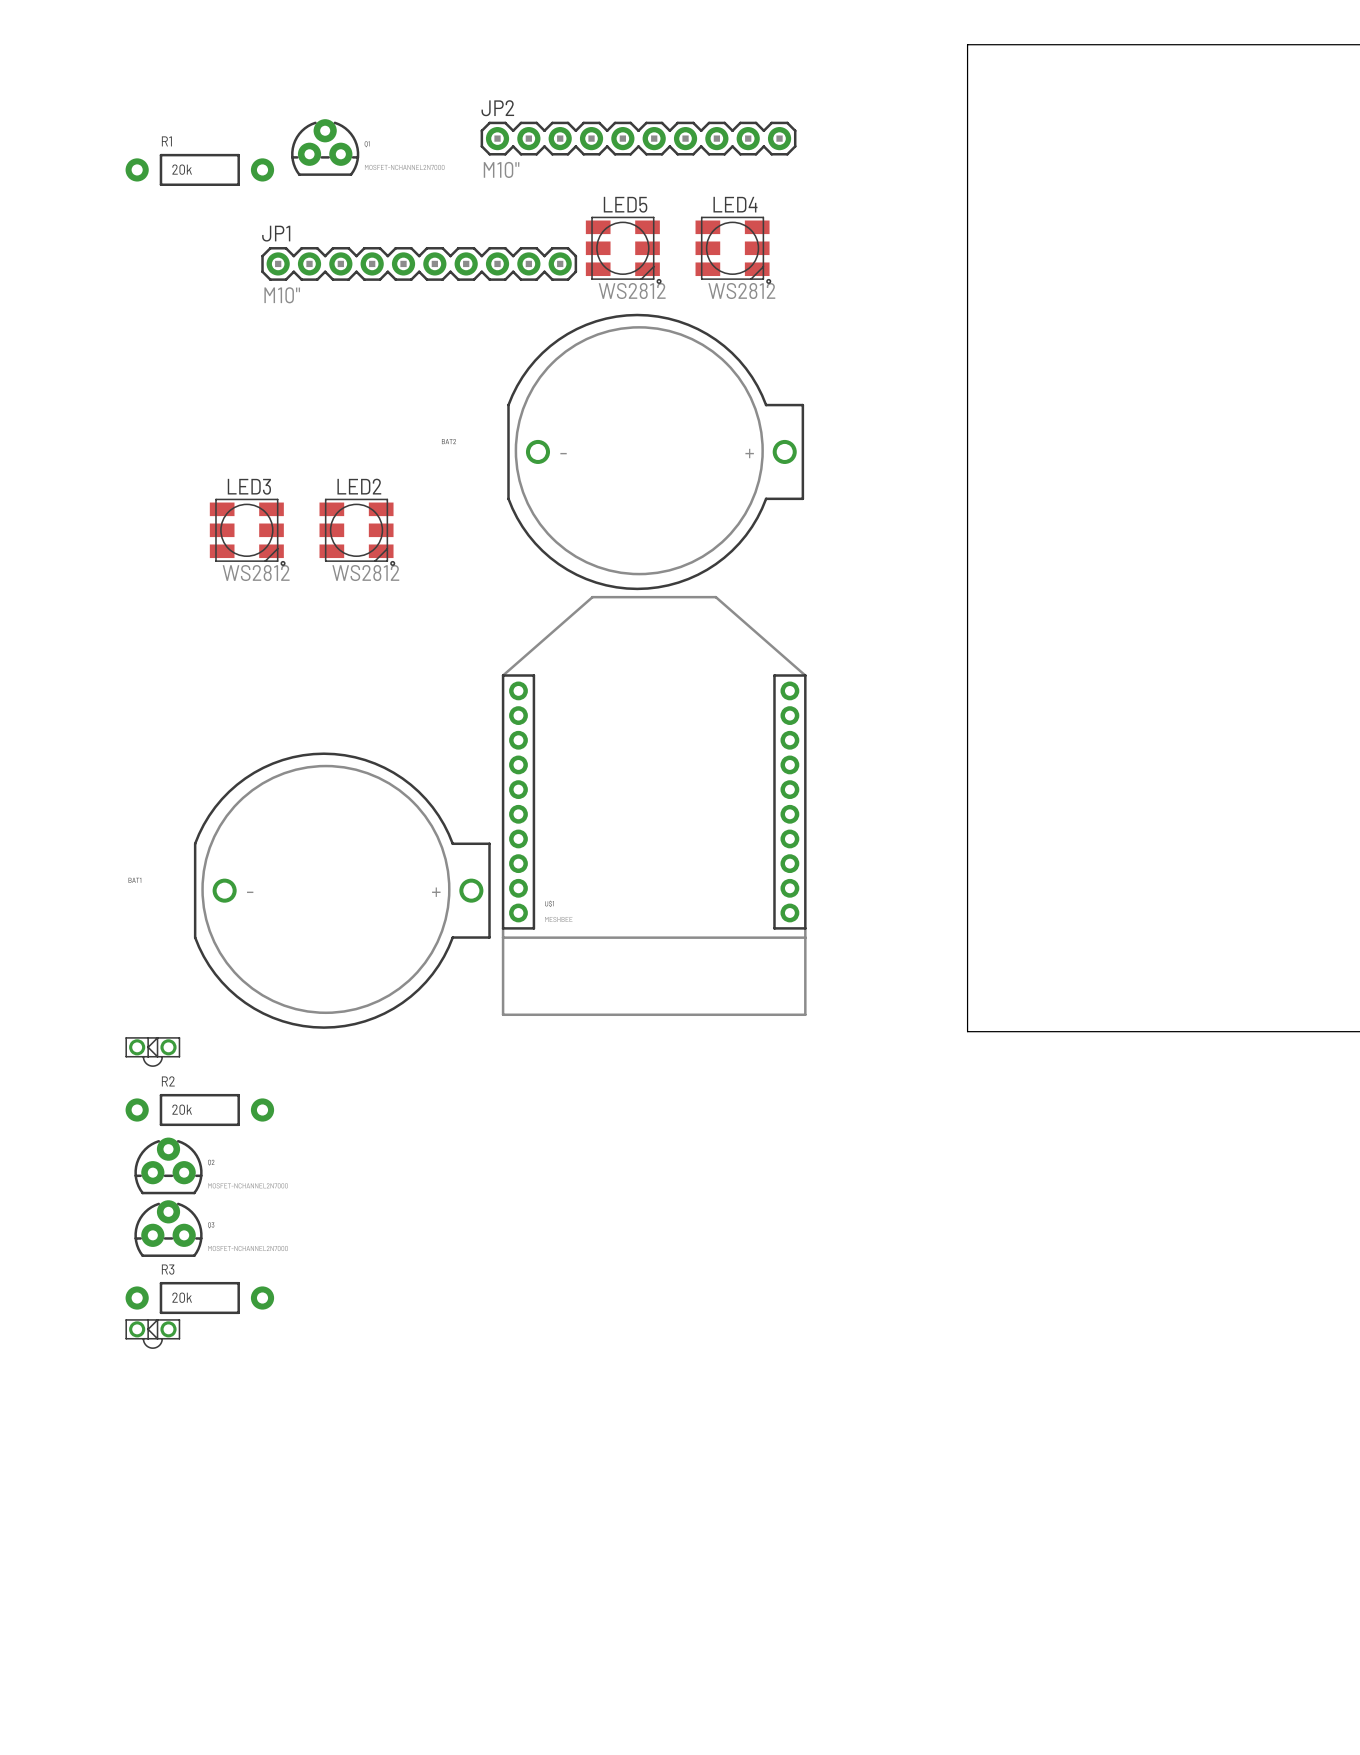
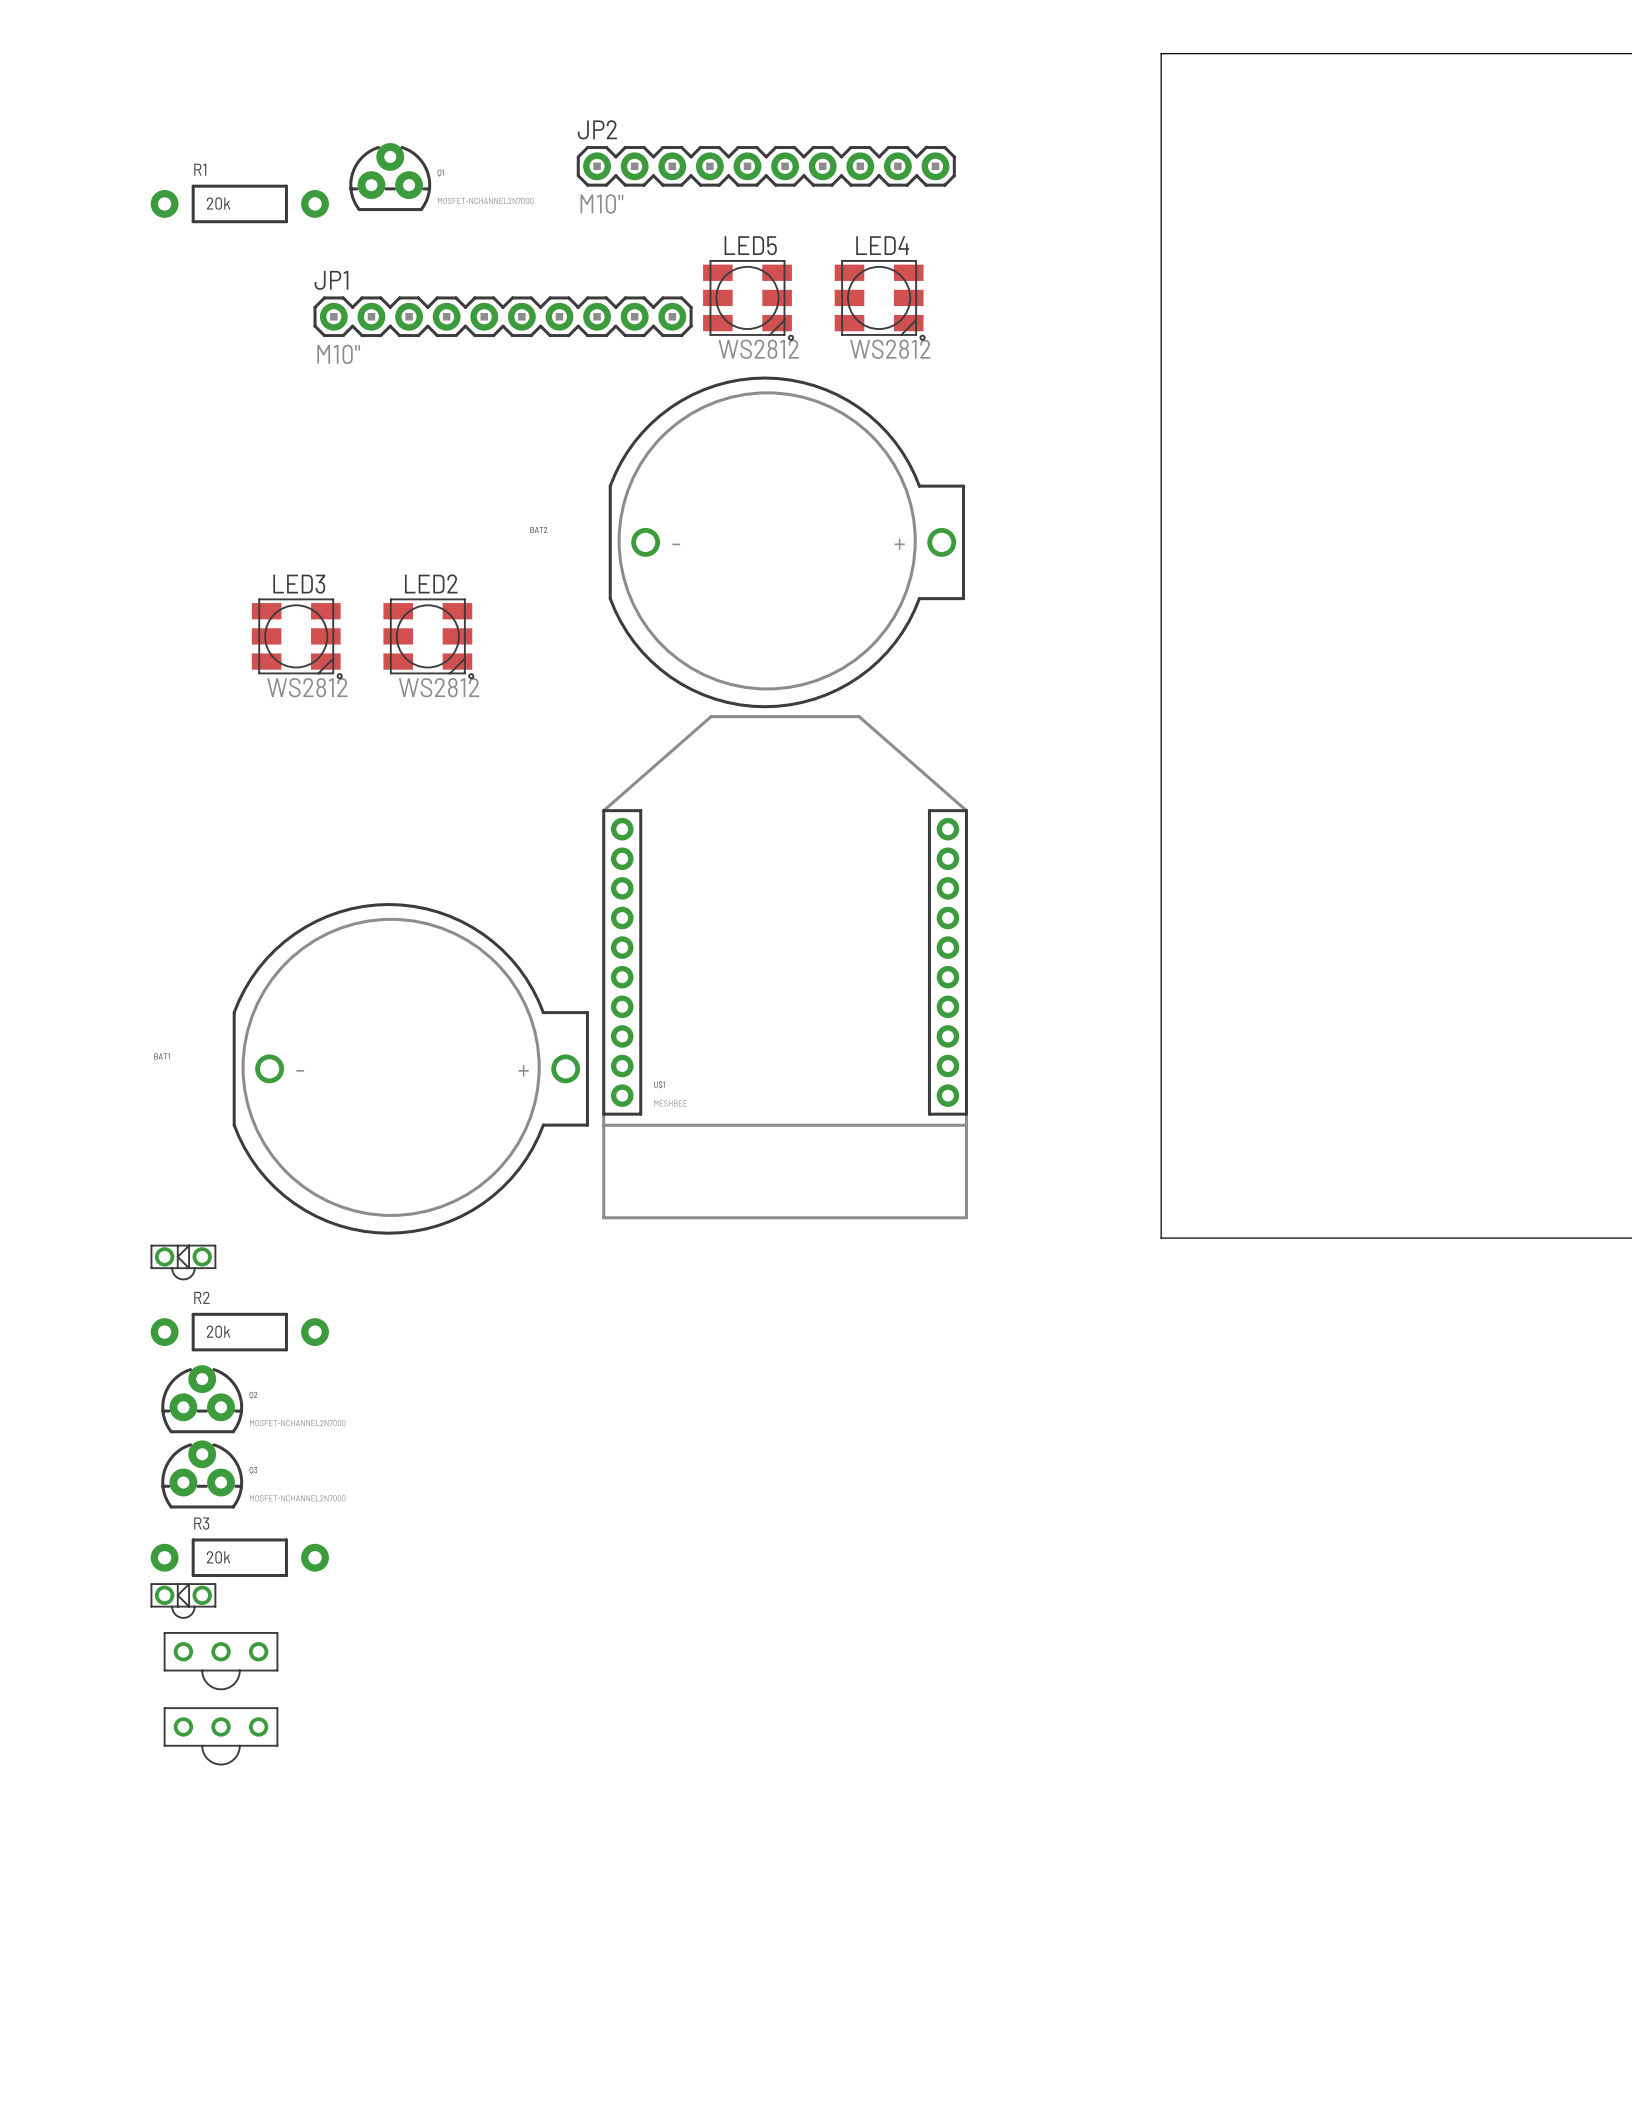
part: none -> (221, 1661)
part: none -> (221, 1736)

